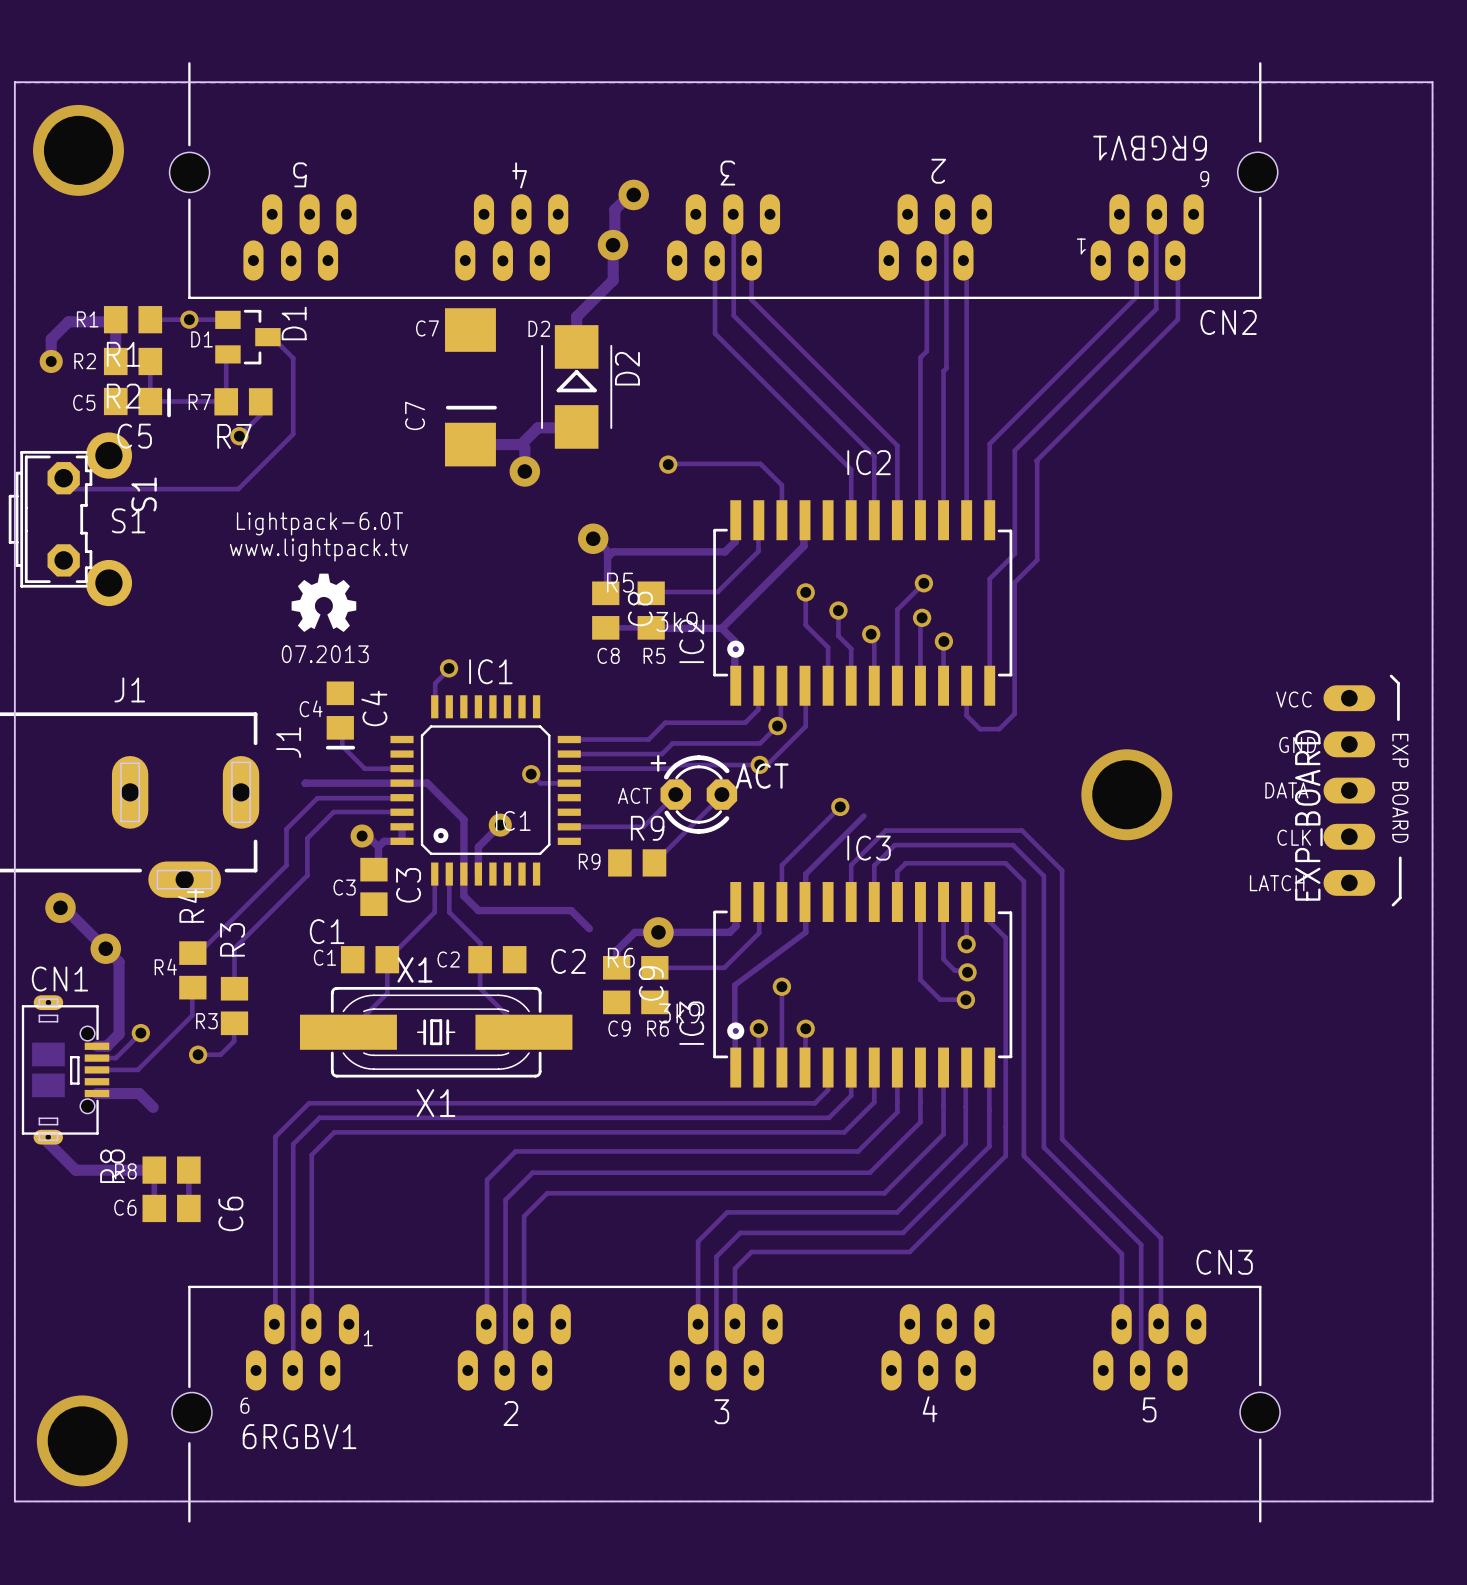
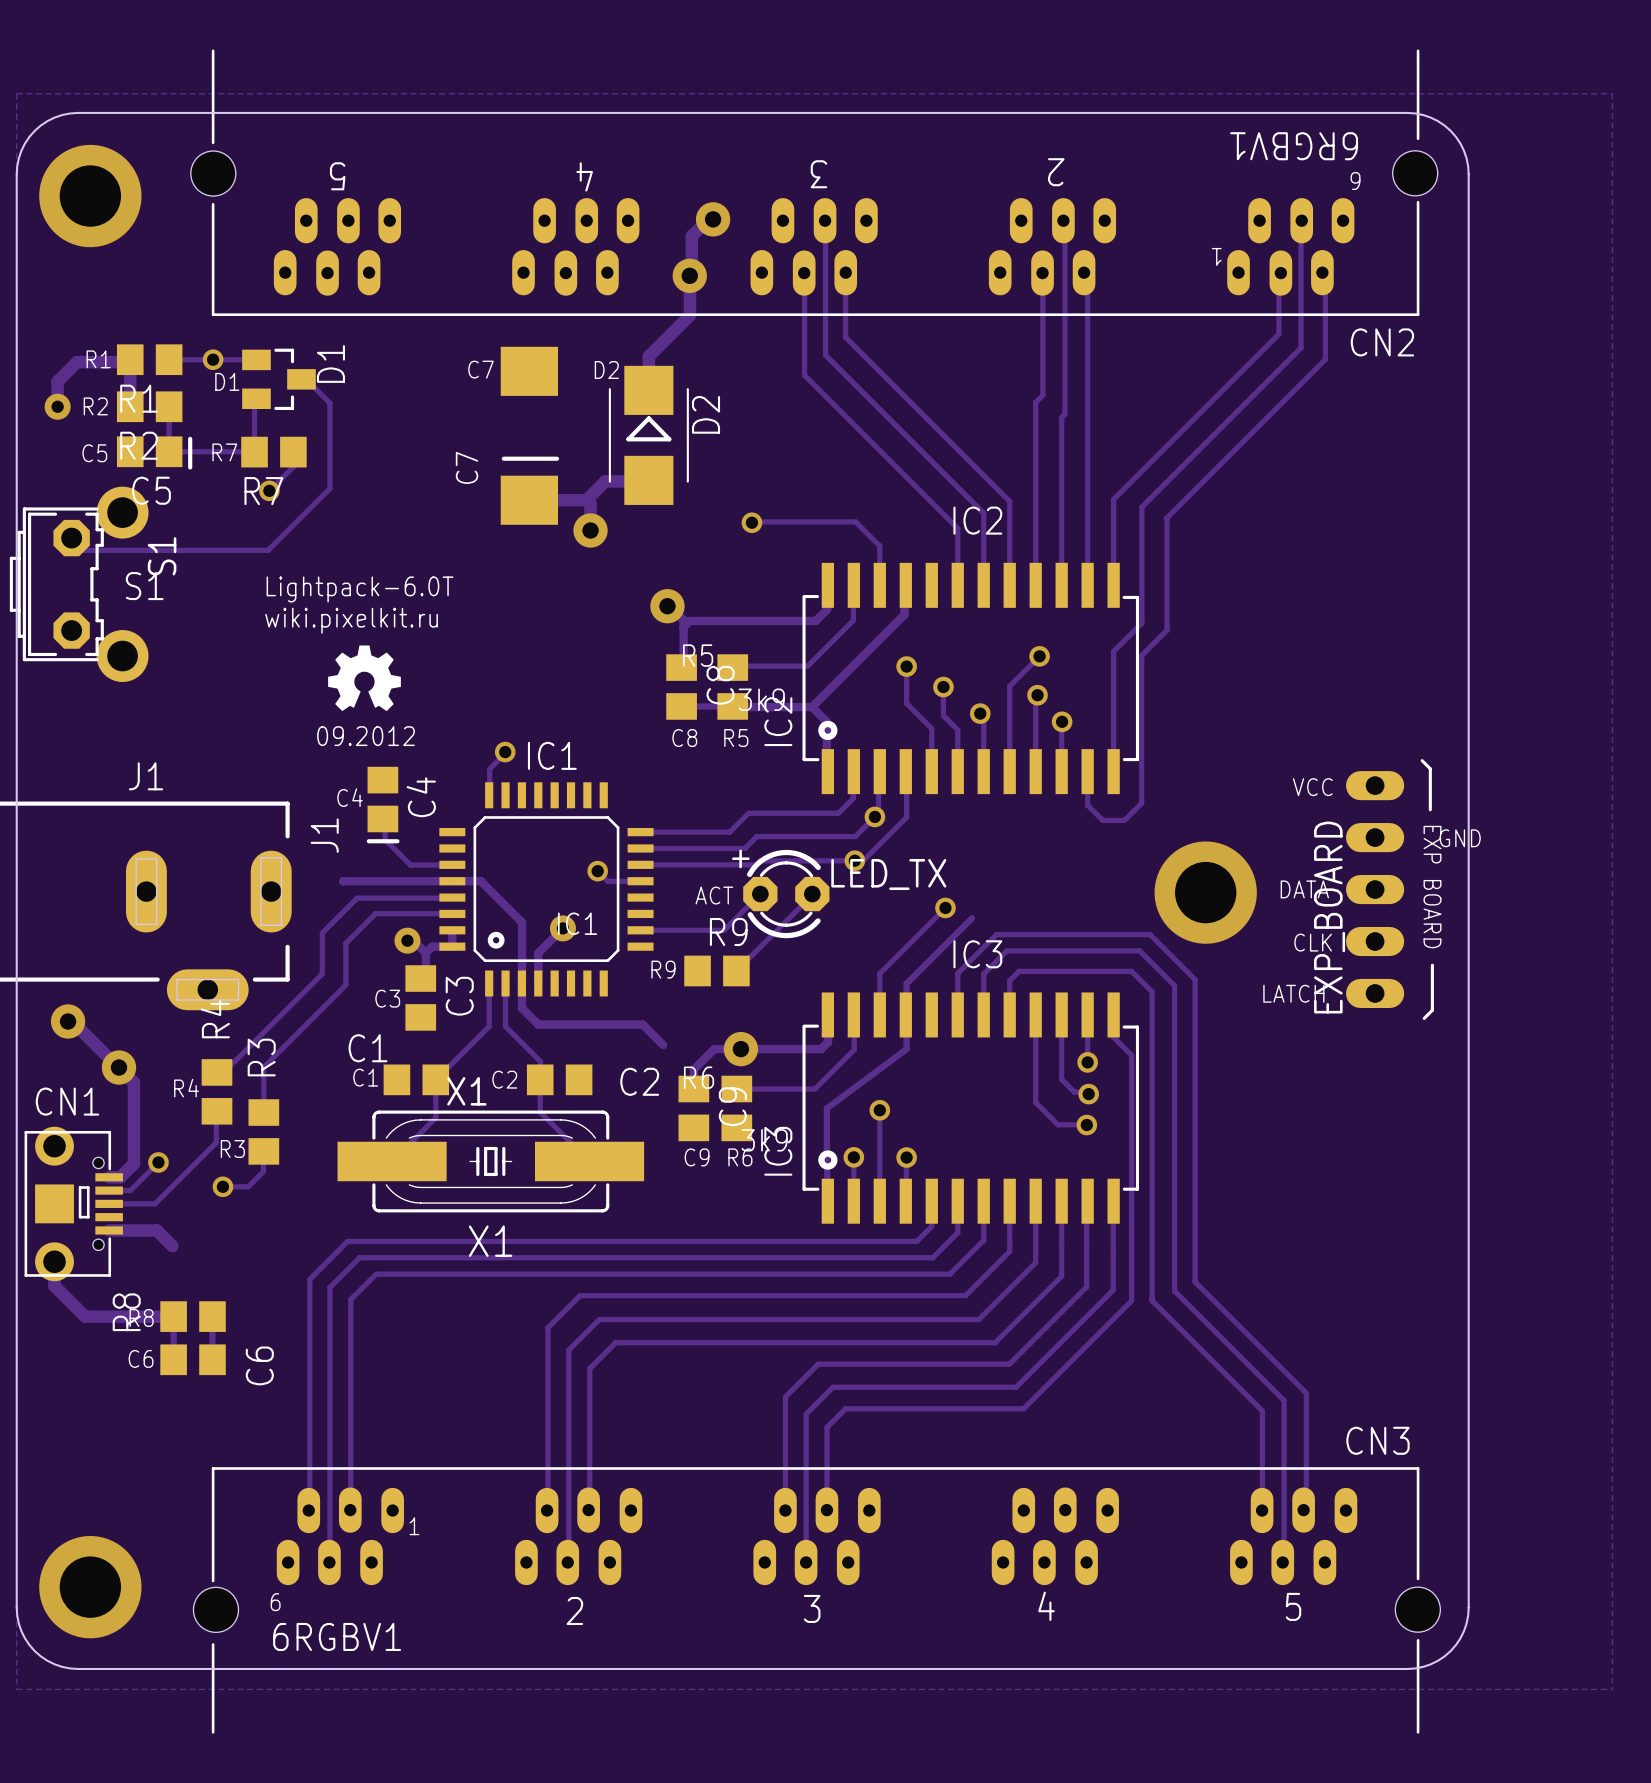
via: (78, 150) -> none
board edge: (14, 154) (14, 82) (1432, 82) (1432, 1501) (14, 1501) (14, 1428) -> (16, 174) (21, 150) (34, 130) (54, 117) (78, 112) (1407, 112) (1430, 117) (1450, 130) (1464, 150) (1468, 174) (1468, 1607) (1464, 1631) (1450, 1651) (1430, 1664) (1407, 1668) (78, 1668) (54, 1664) (34, 1651) (21, 1631) (16, 1607)
via: none -> (90, 196)
CN2 position: (723, 180) -> (814, 182)
text: www.lightpack.tv (318, 550) -> wiki.pixelkit.ru (351, 620)
text: 07.2013 (325, 654) -> 09.2012 (366, 736)
line: (1391, 676) (1398, 683) (1398, 719) -> (1422, 760) (1430, 768) (1430, 809)
text position: VCC (1293, 699) -> VCC (1312, 787)
ACT name: ACT (762, 776) -> LED_TX (888, 874)
text position: EXP BOARD (1400, 788) -> EXP BOARD (1432, 887)
text position: DATA (1286, 790) -> DATA (1304, 889)
EXP_BOARD position: (1349, 790) -> (1375, 889)
via: none -> (1205, 892)
via: (1126, 794) -> none
text position: CLK (1294, 837) -> CLK (1313, 942)
line: (1400, 857) (1400, 897) (1392, 905) -> (1432, 965) (1432, 1010) (1424, 1018)
text position: LATCH (1277, 883) -> LATCH (1293, 993)
part footprint: [21, 995, 110, 1145] -> [24, 1126, 123, 1282]
CN3 position: (726, 1404) -> (816, 1600)
via: none -> (90, 1587)
via: (82, 1440) -> none

